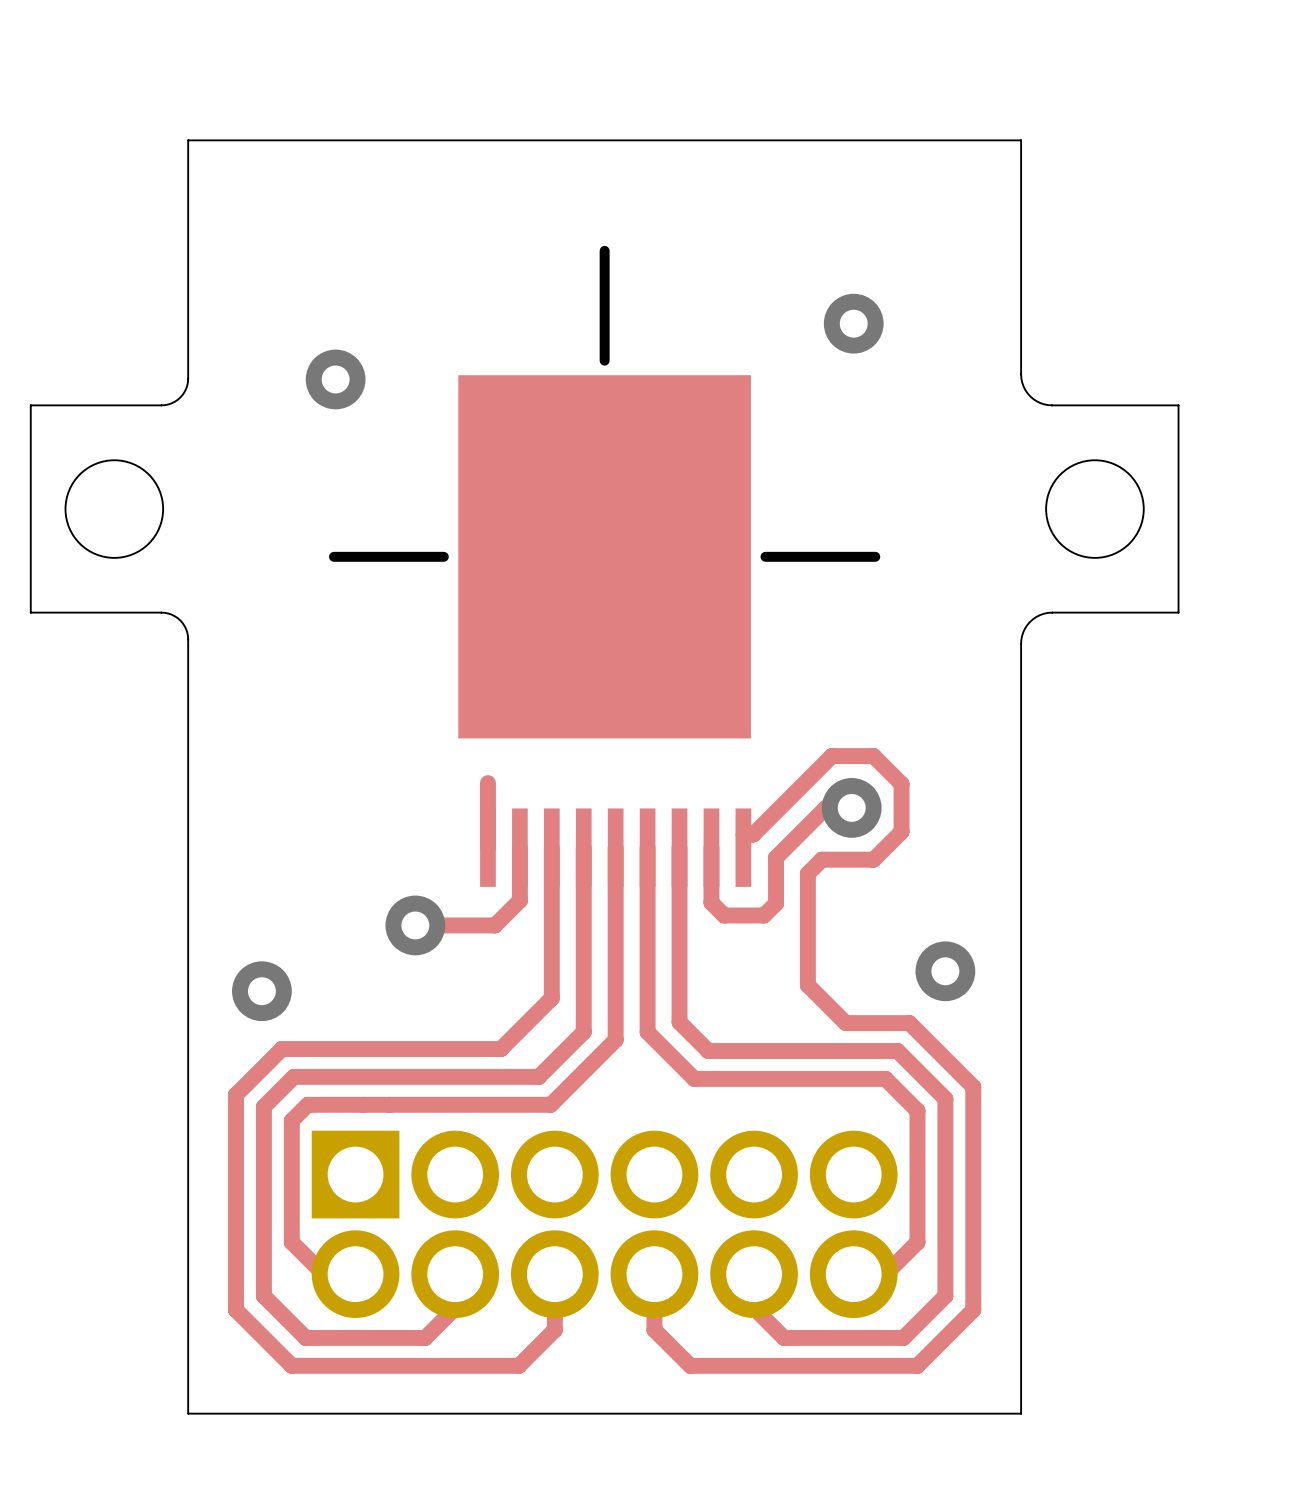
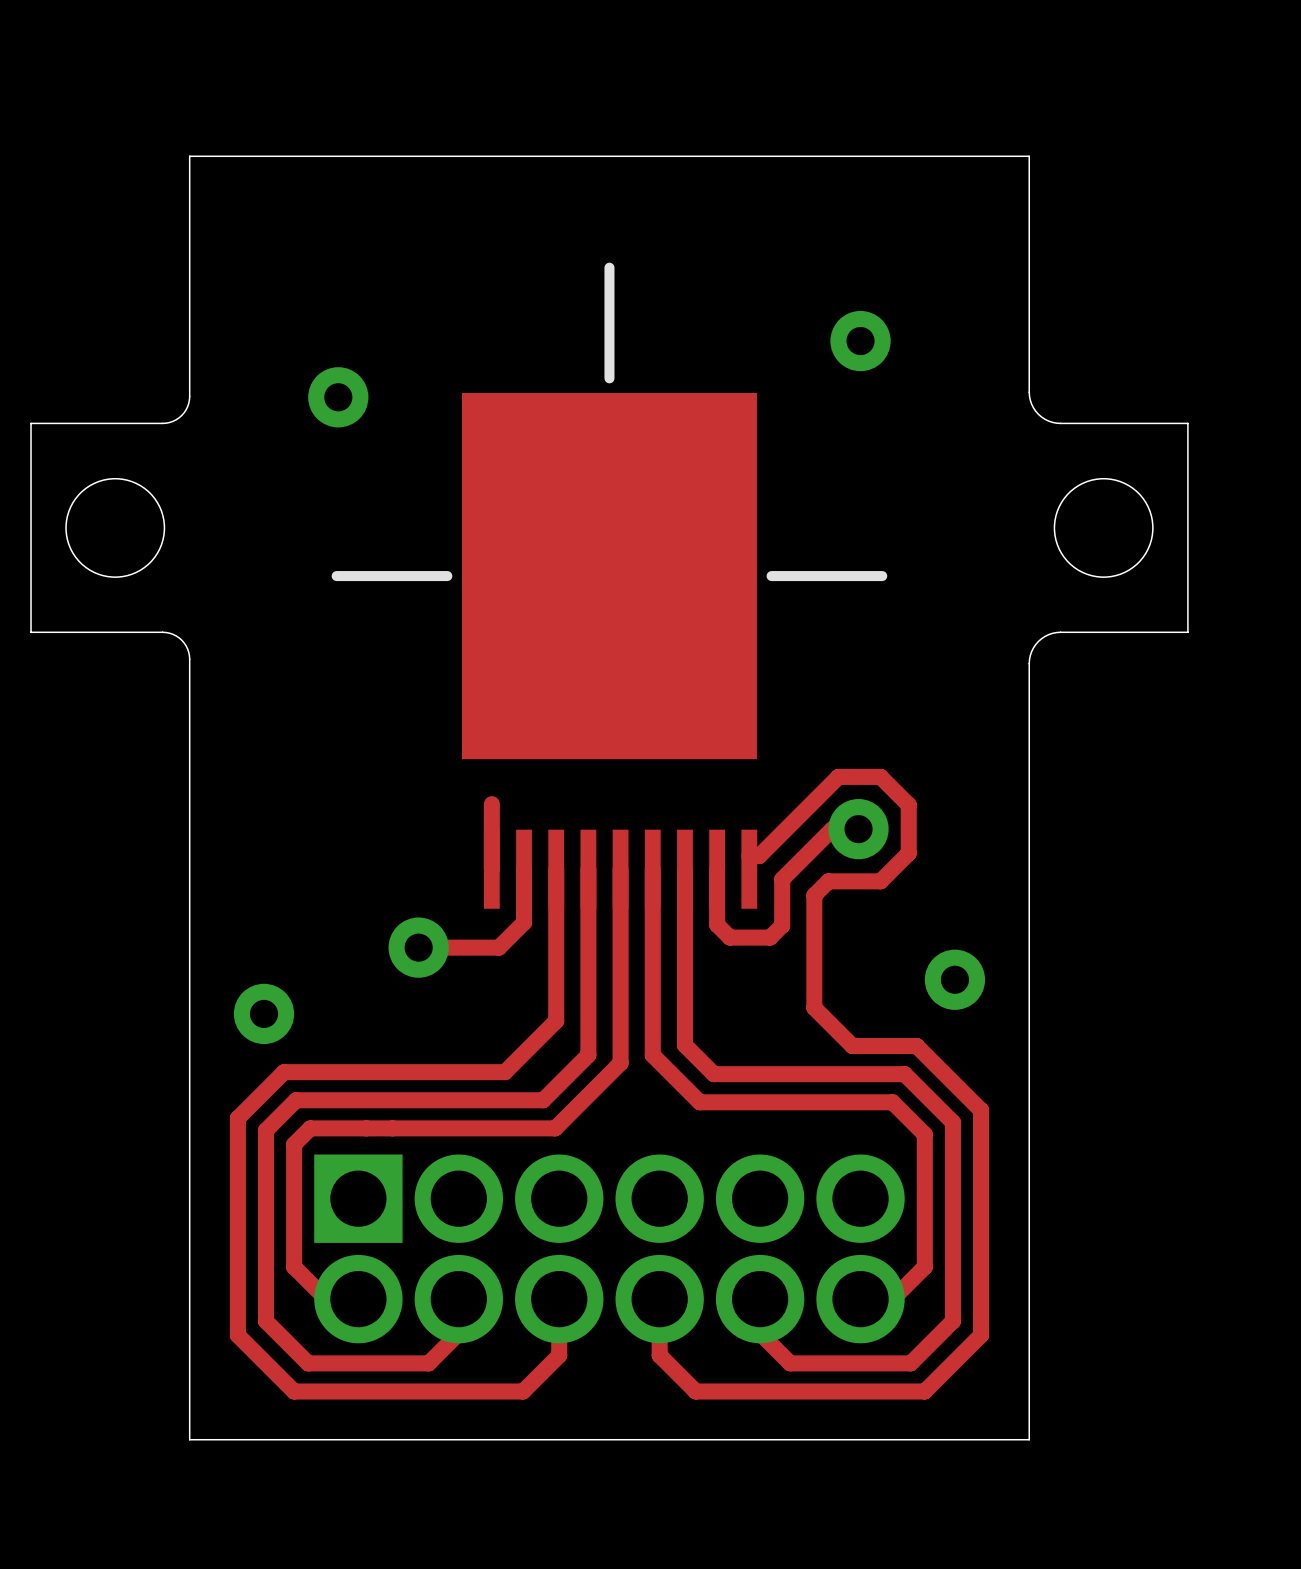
via position: (945, 971) -> (954, 979)

